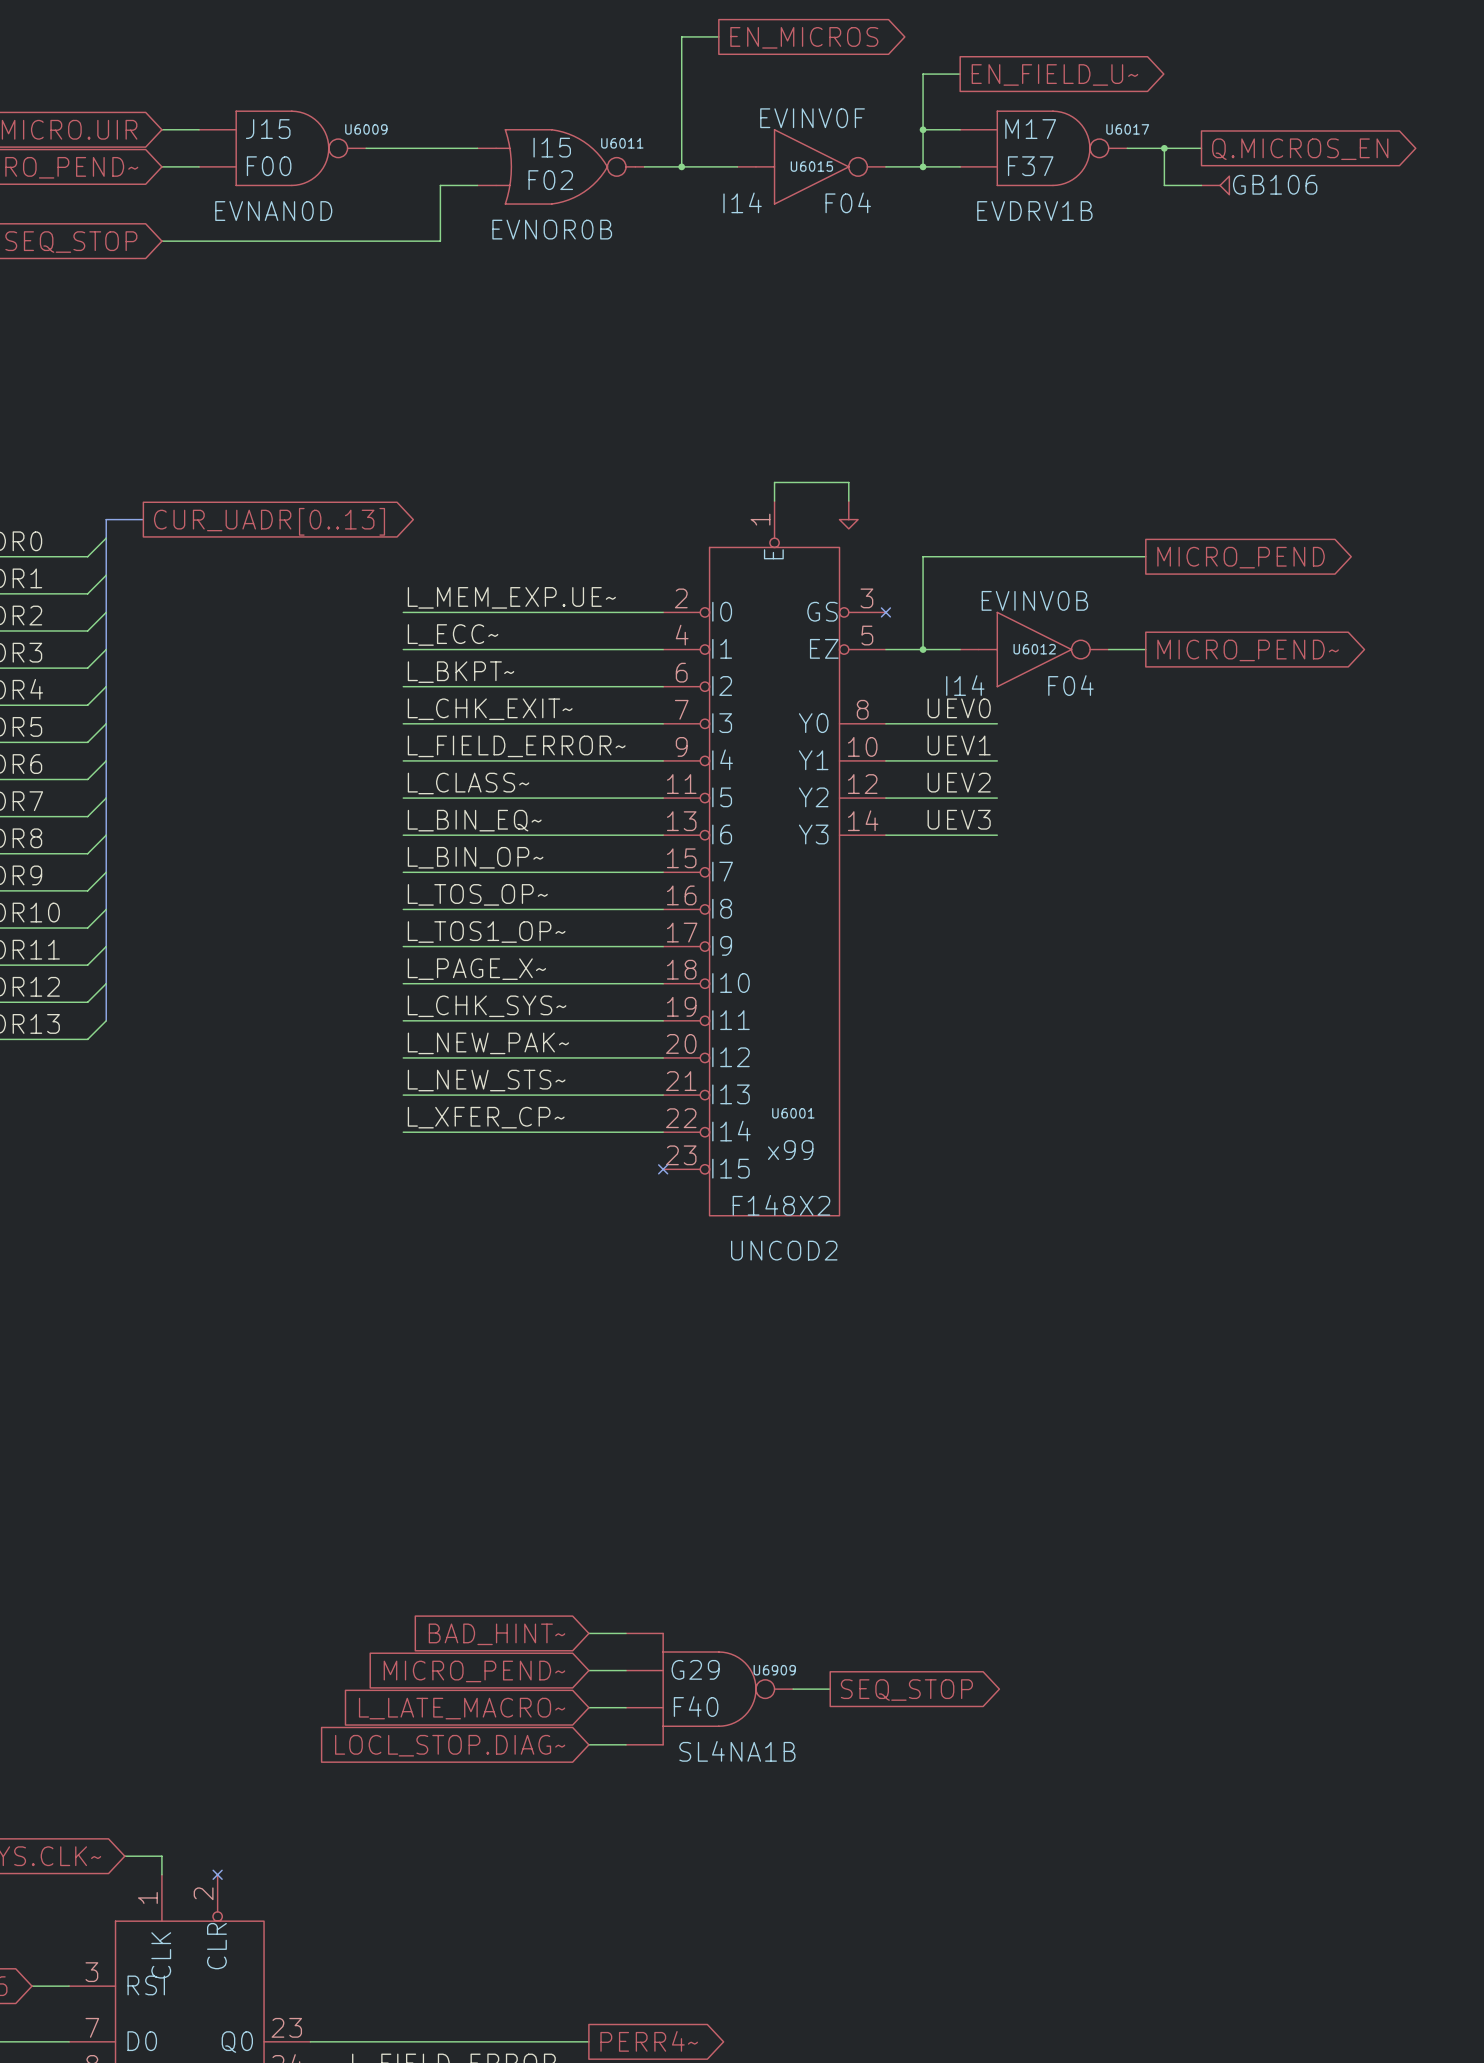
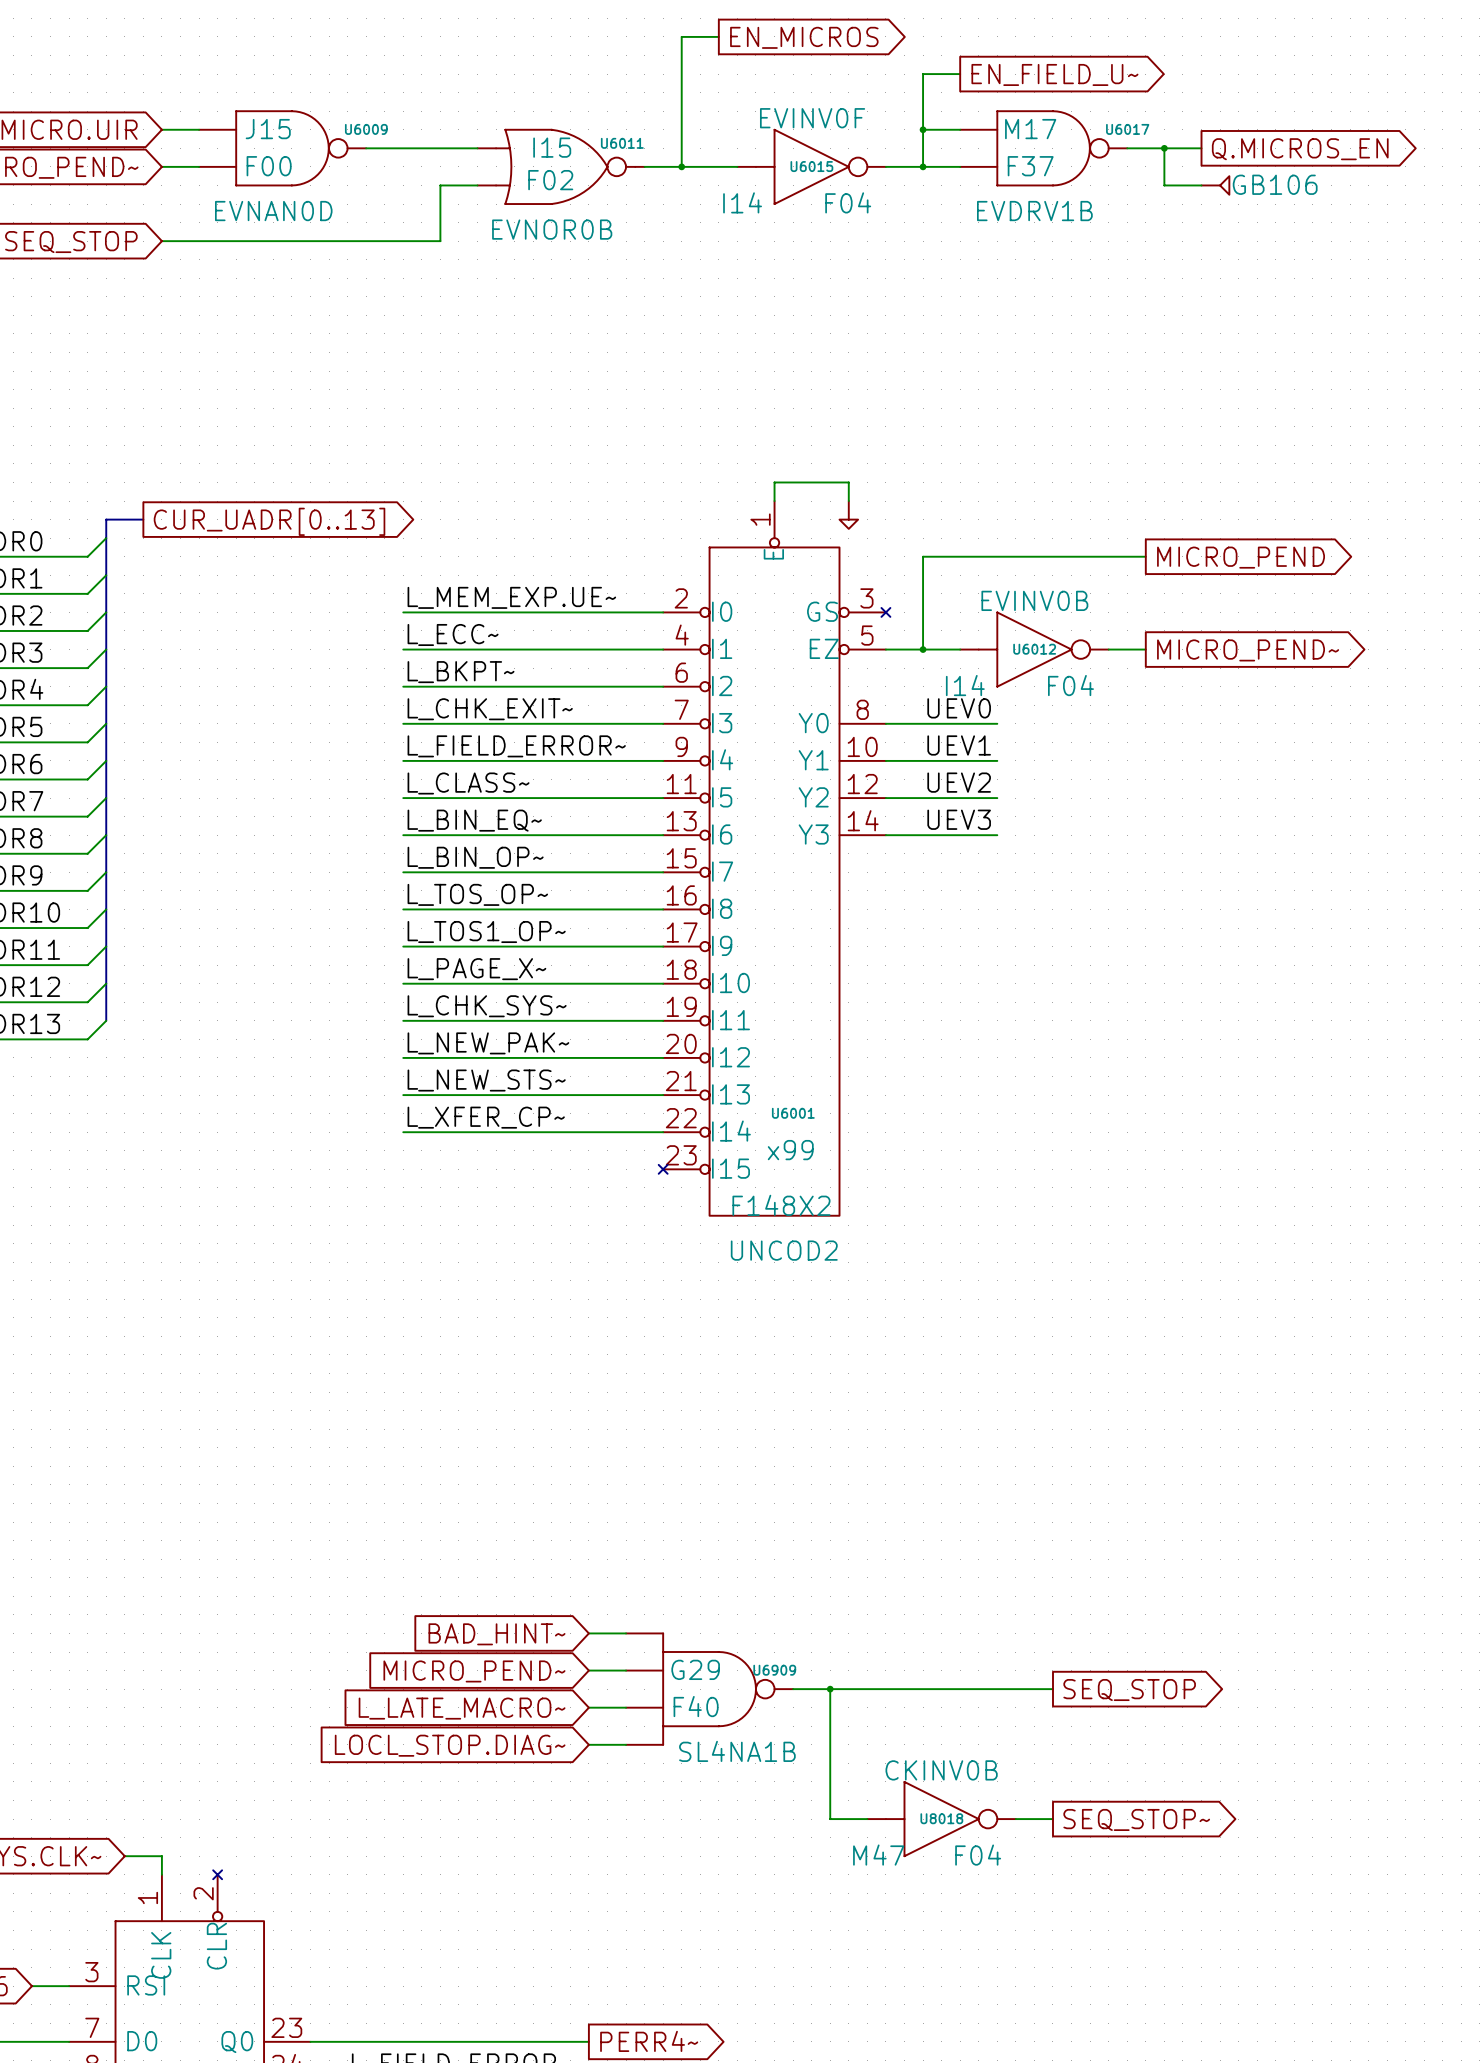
junction: none -> (830, 1689)
wire: none -> (1052, 1689) (830, 1689) (830, 1819) (867, 1819)
global label: SEQ_STOP (906, 1690) -> none
global label: none -> SEQ_STOP (1129, 1690)
U8018: none -> F04 (941, 1819)
wire: none -> (1015, 1819) (1052, 1819)
global label: none -> SEQ_STOP~ (1136, 1819)

